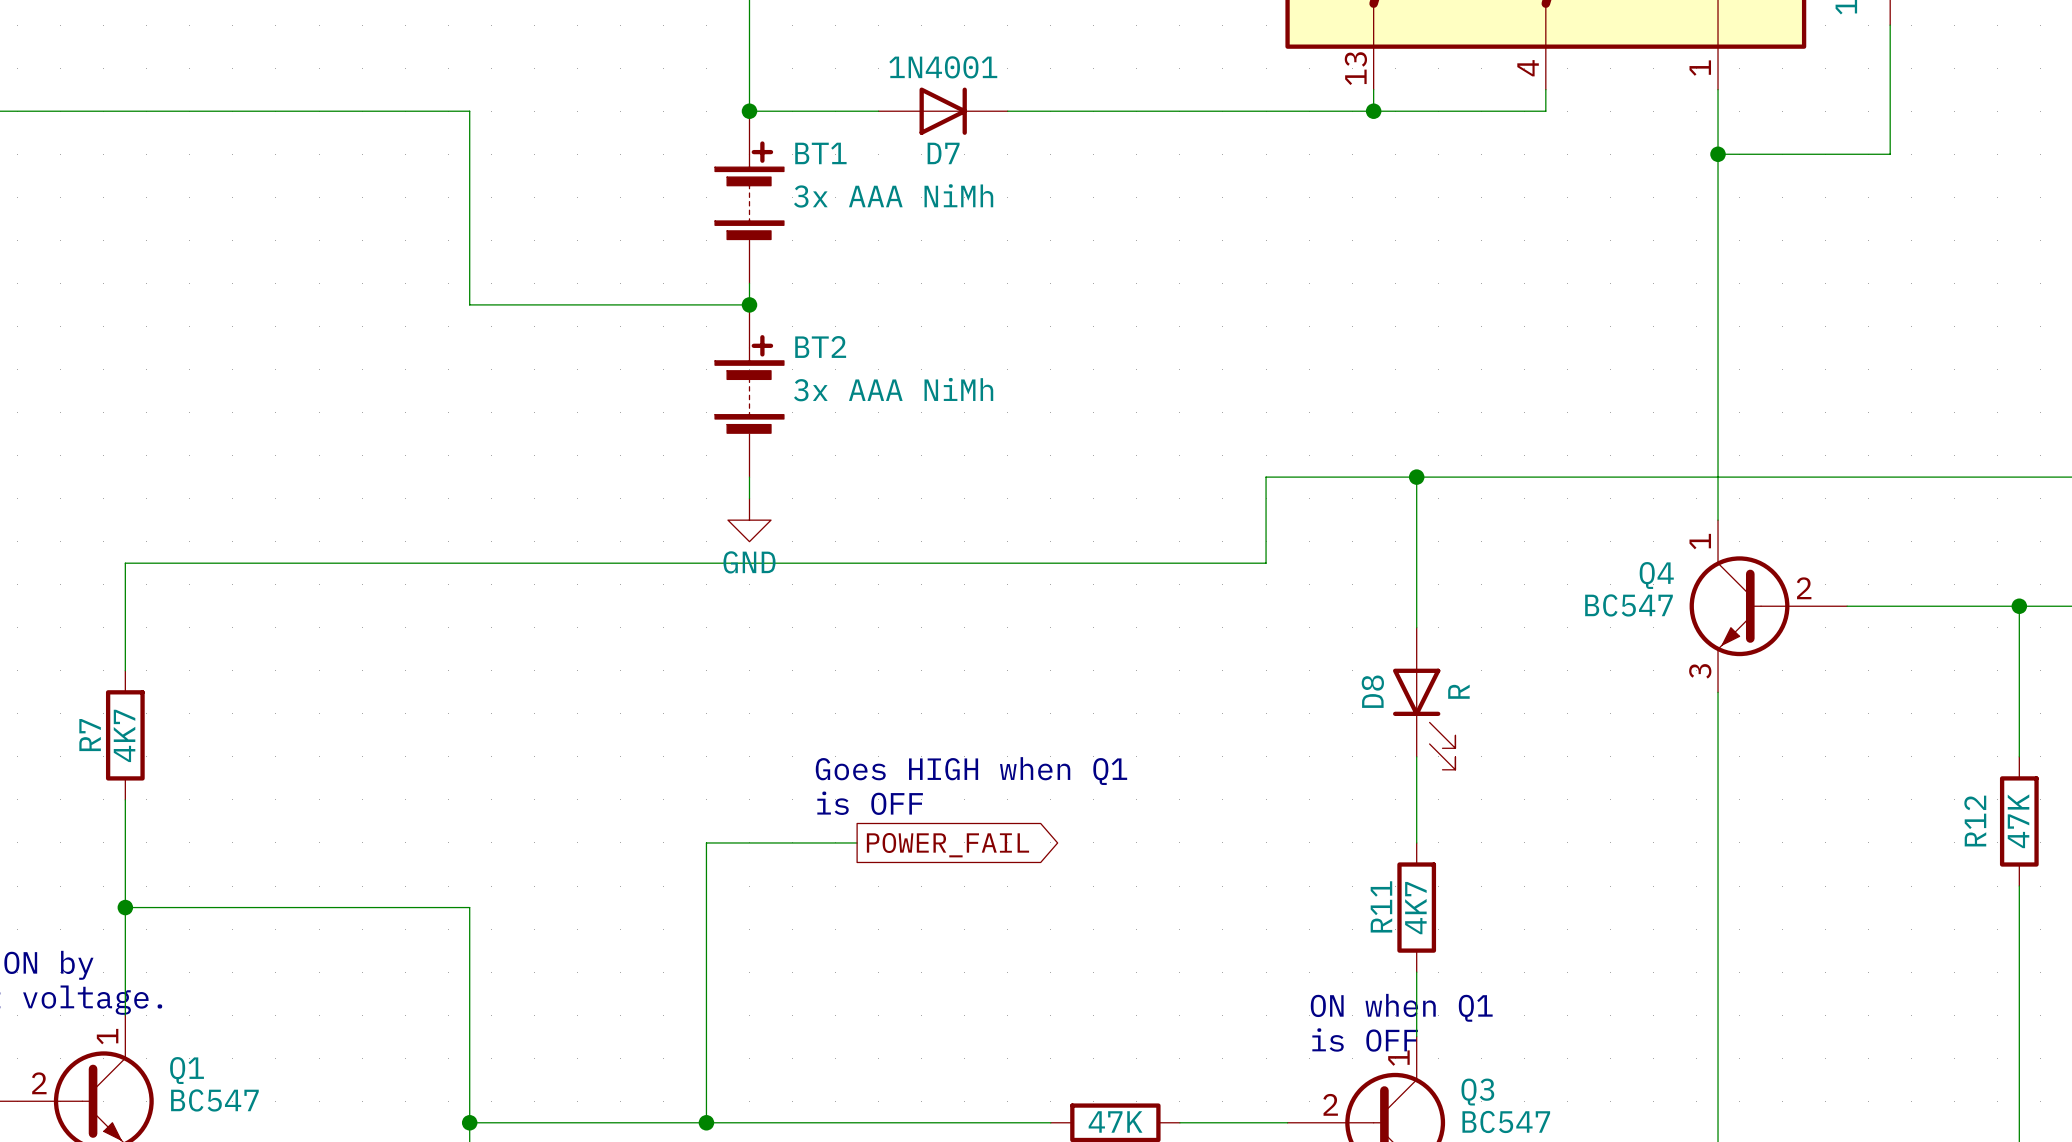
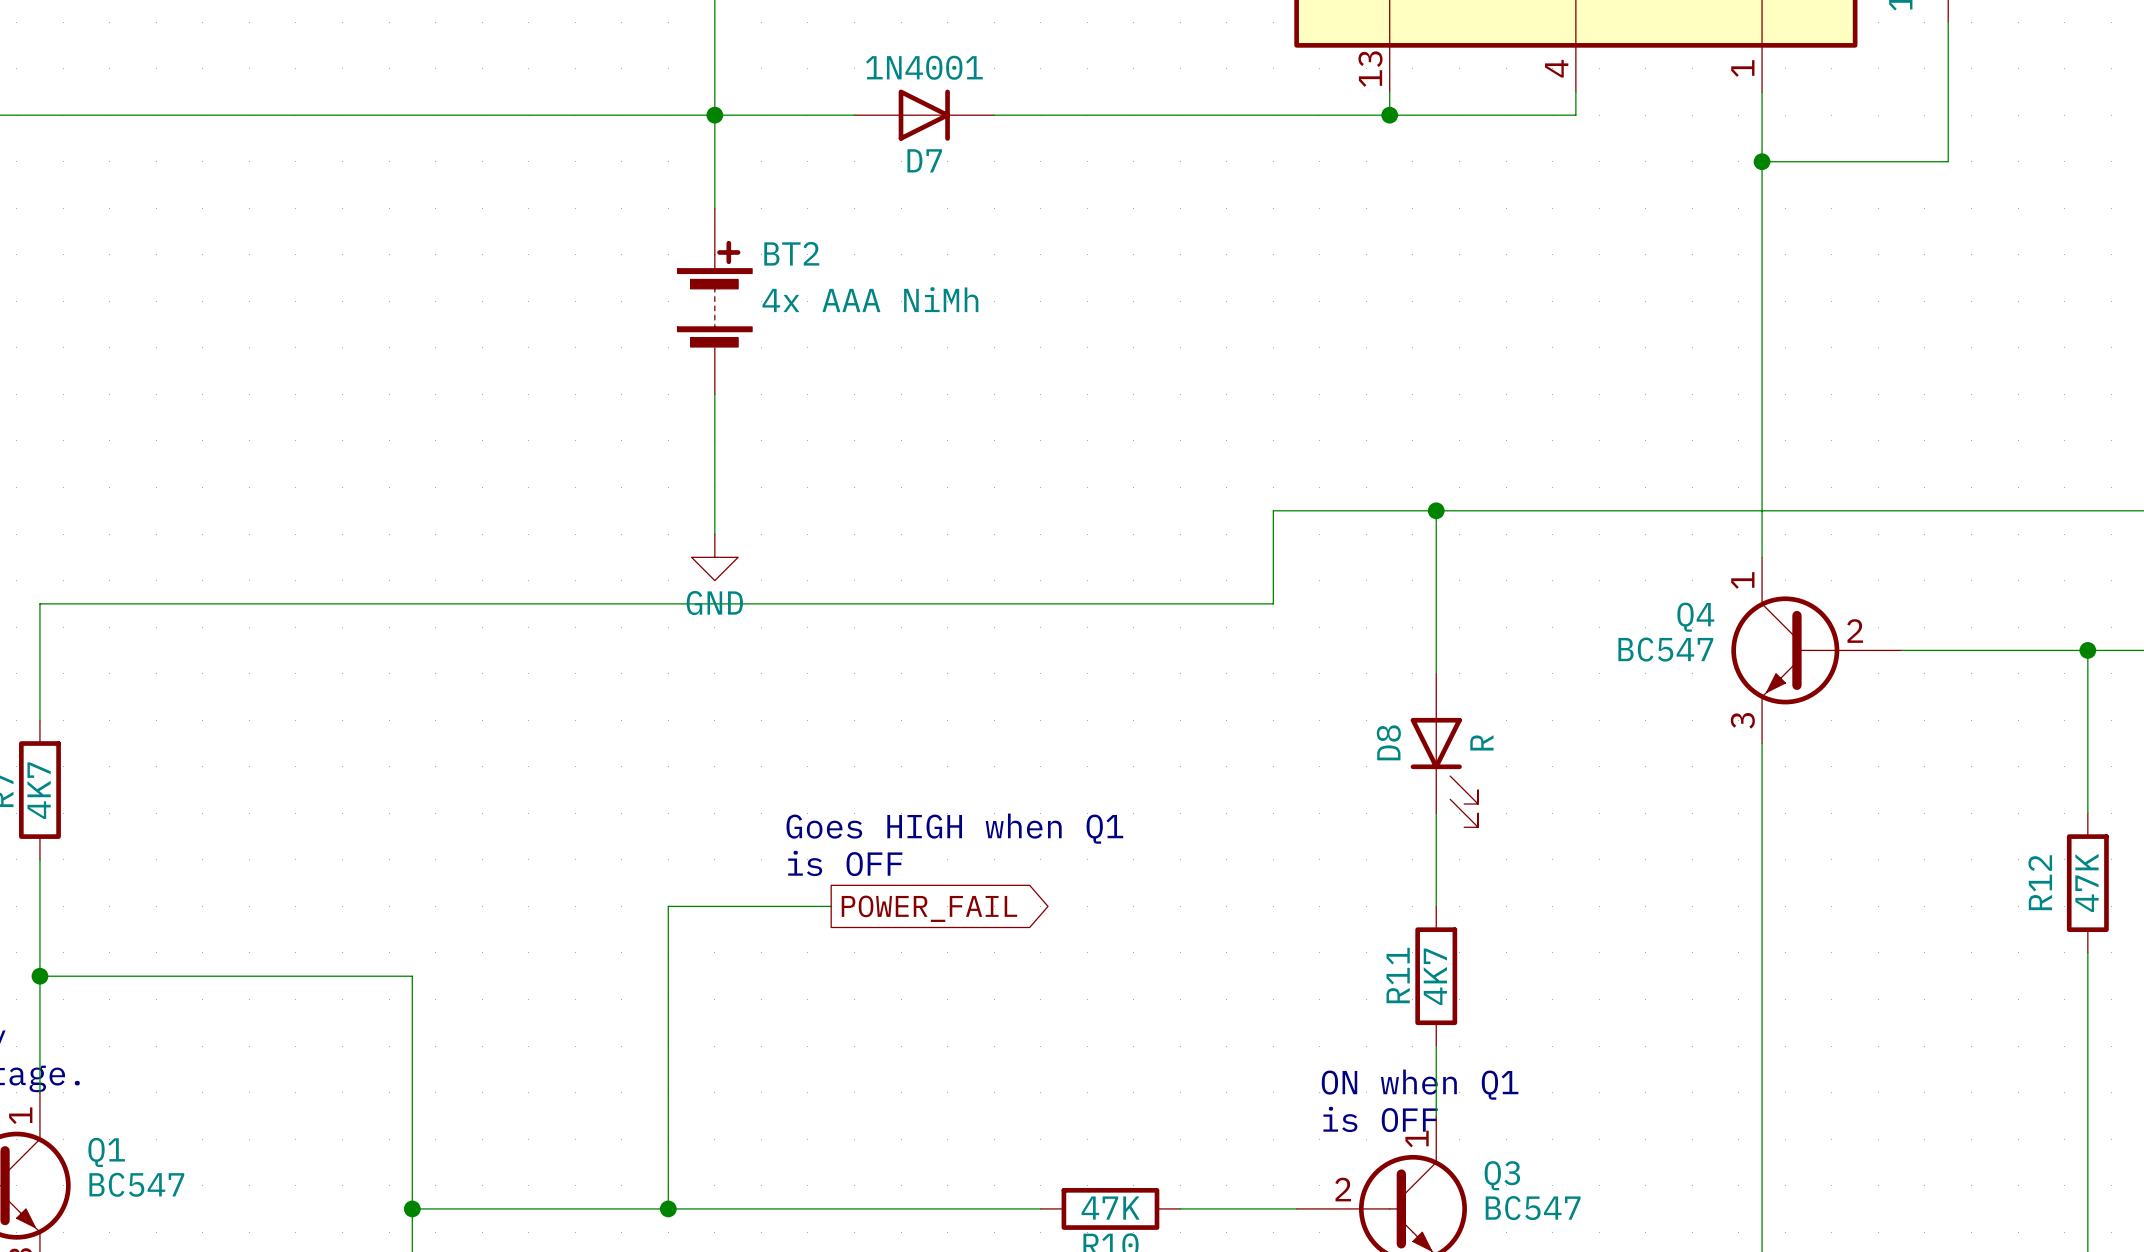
wire: (469, 111) (469, 304) (749, 304) (749, 283) -> (412, 115) (714, 115) (714, 208)
BT1: 3x AAA NiMh (749, 197) -> none
junction: (749, 304) -> none
BT2 value: 3x AAA NiMh (893, 389) -> 4x AAA NiMh (870, 299)
BT2 position: (749, 391) -> (714, 301)

